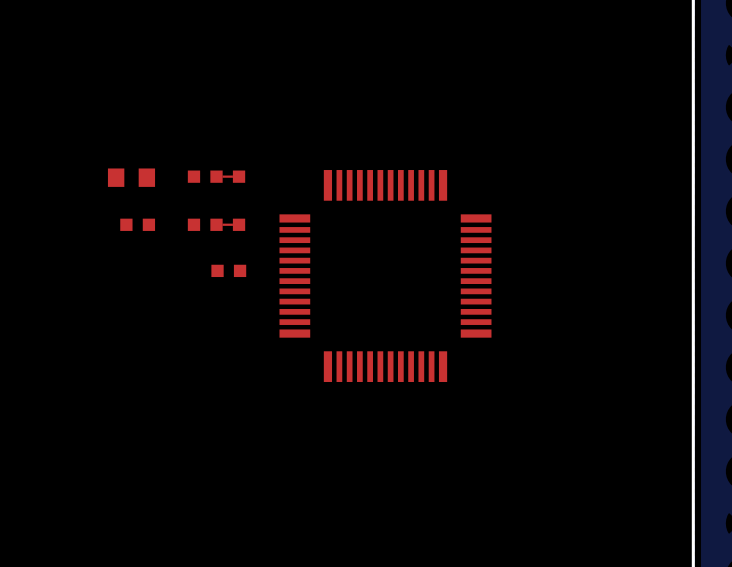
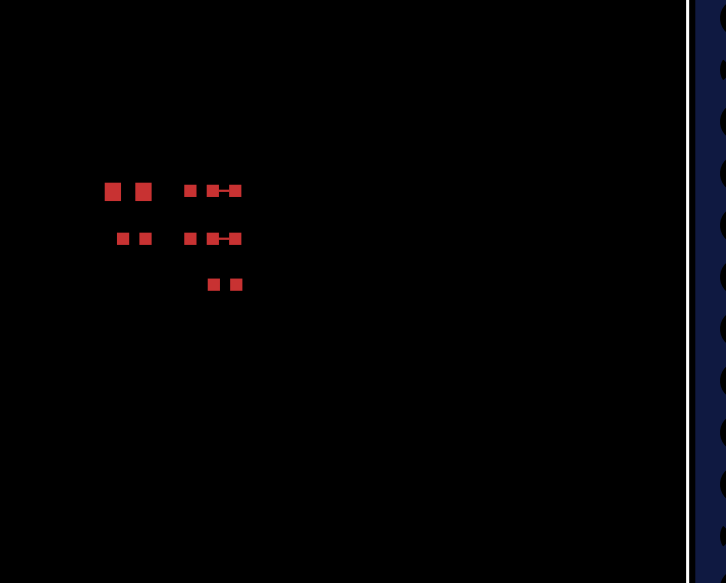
part: (385, 276) -> none

